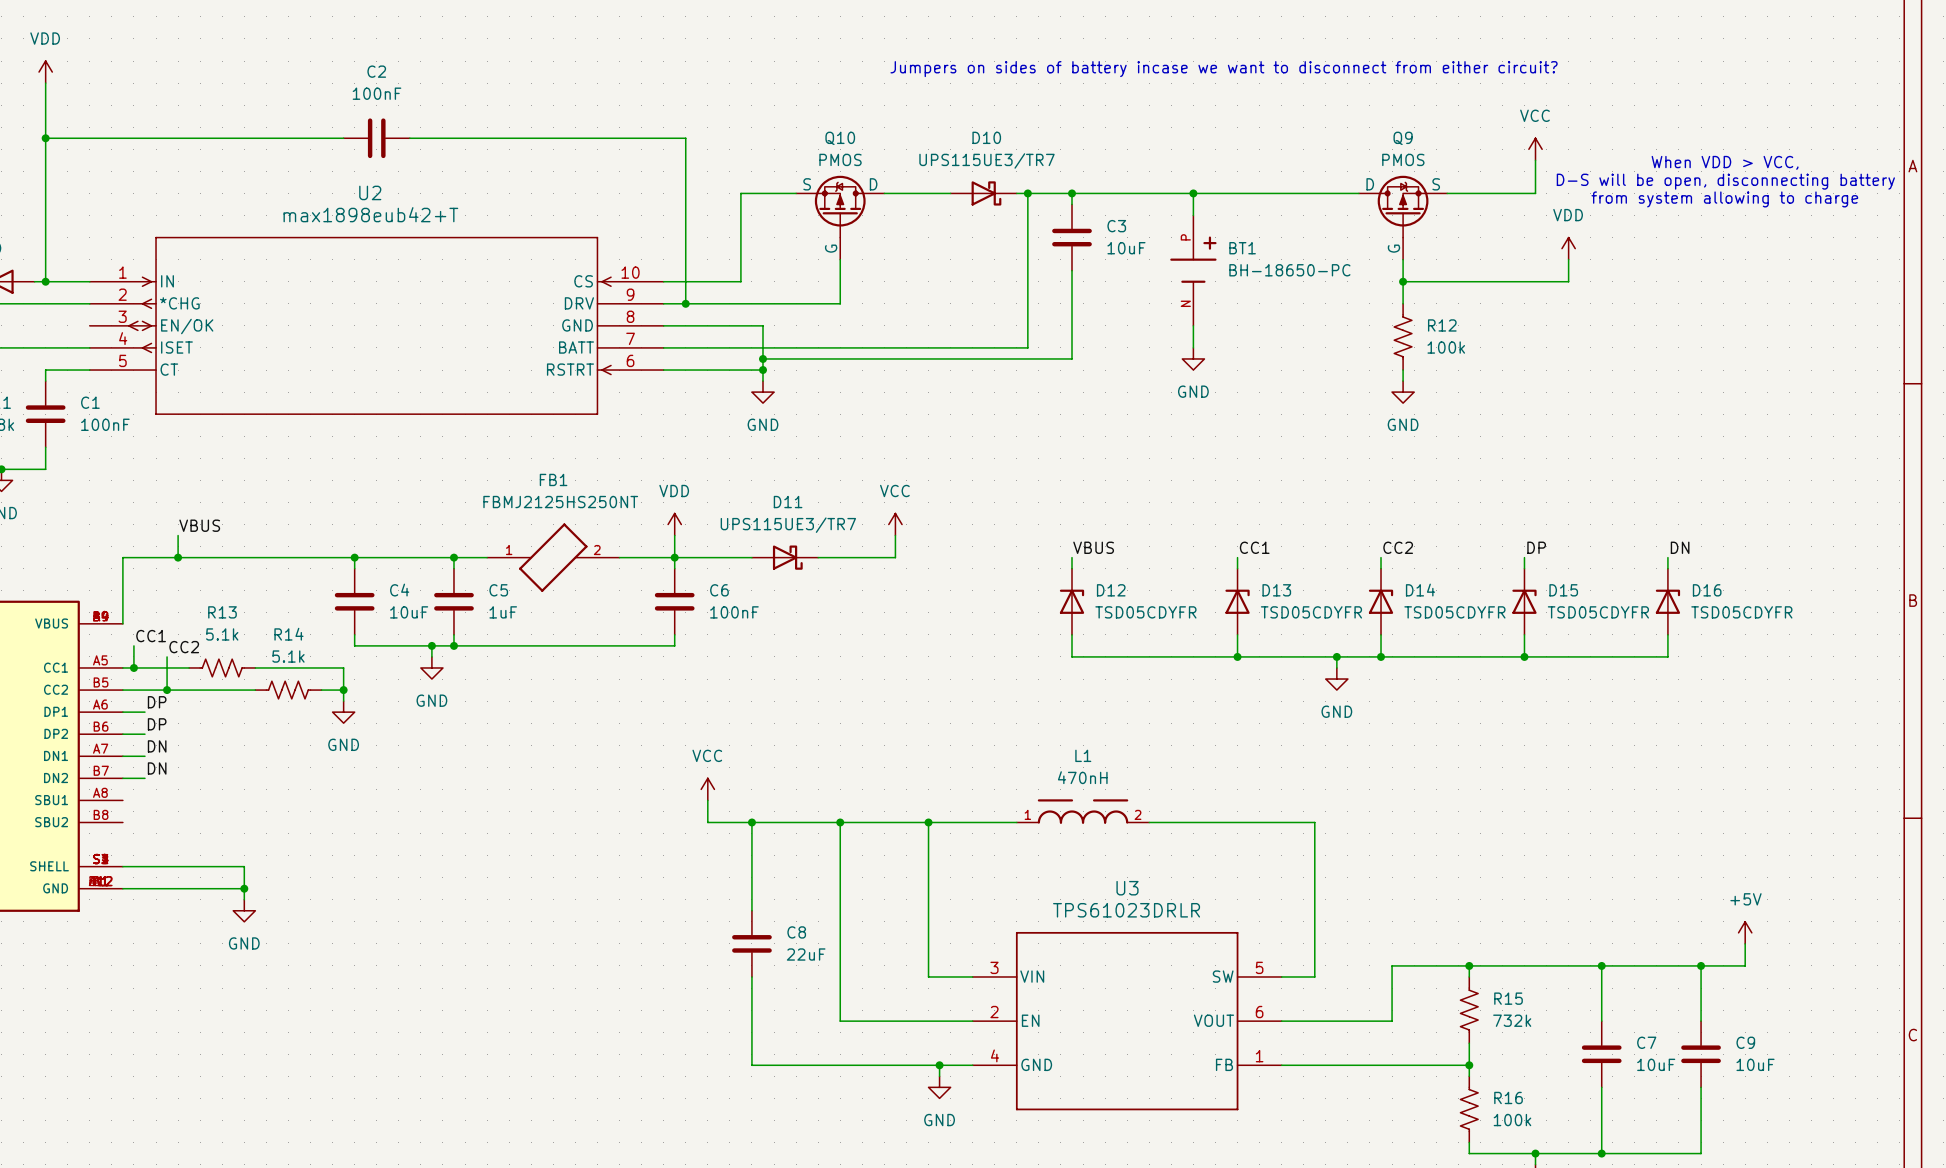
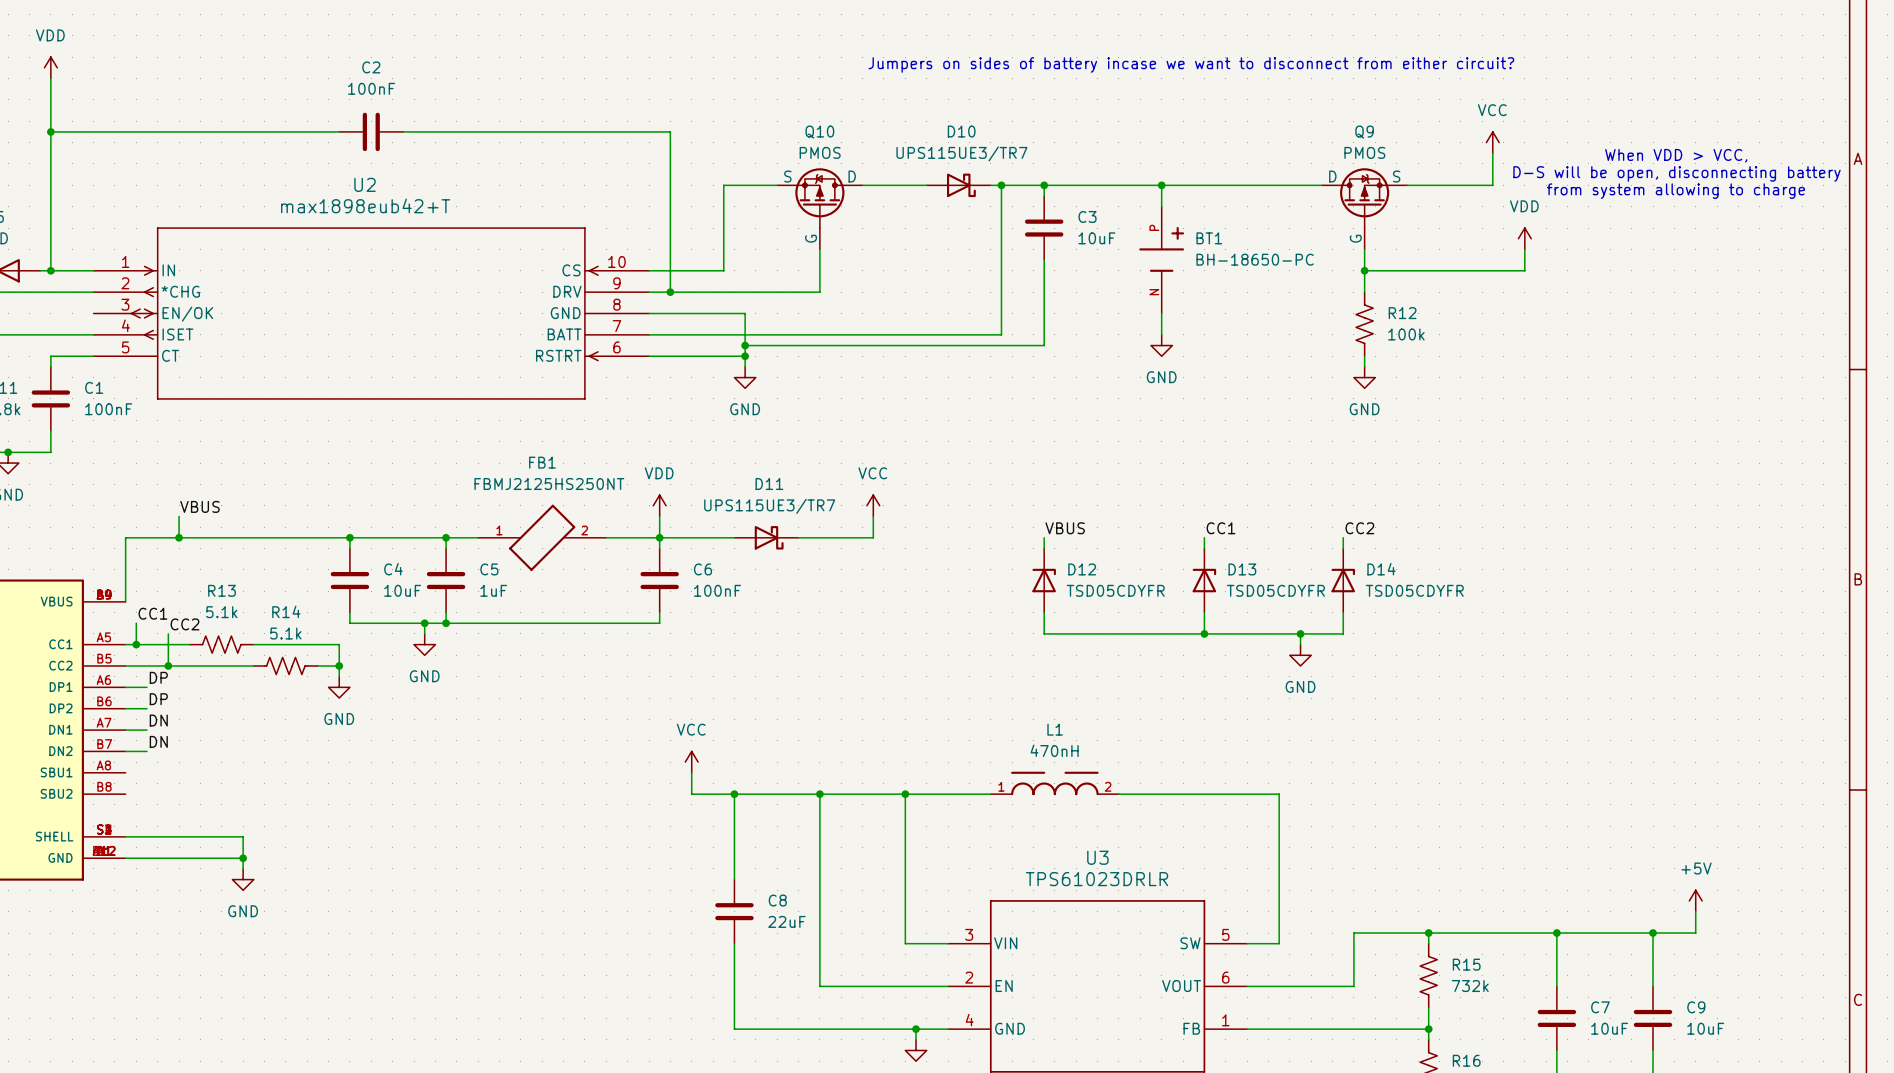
label: DP (1536, 547) -> none
label: DN (1680, 547) -> none
wire: (1524, 557) (1524, 568) -> none
wire: (1667, 557) (1667, 568) -> none
D15: TSD05CDYFR (1524, 601) -> none
D16: TSD05CDYFR (1667, 601) -> none
wire: (1524, 634) (1524, 656) -> none
wire: (1667, 634) (1667, 656) (1381, 656) -> none
junction: (1381, 656) -> none
junction: (1524, 656) -> none

